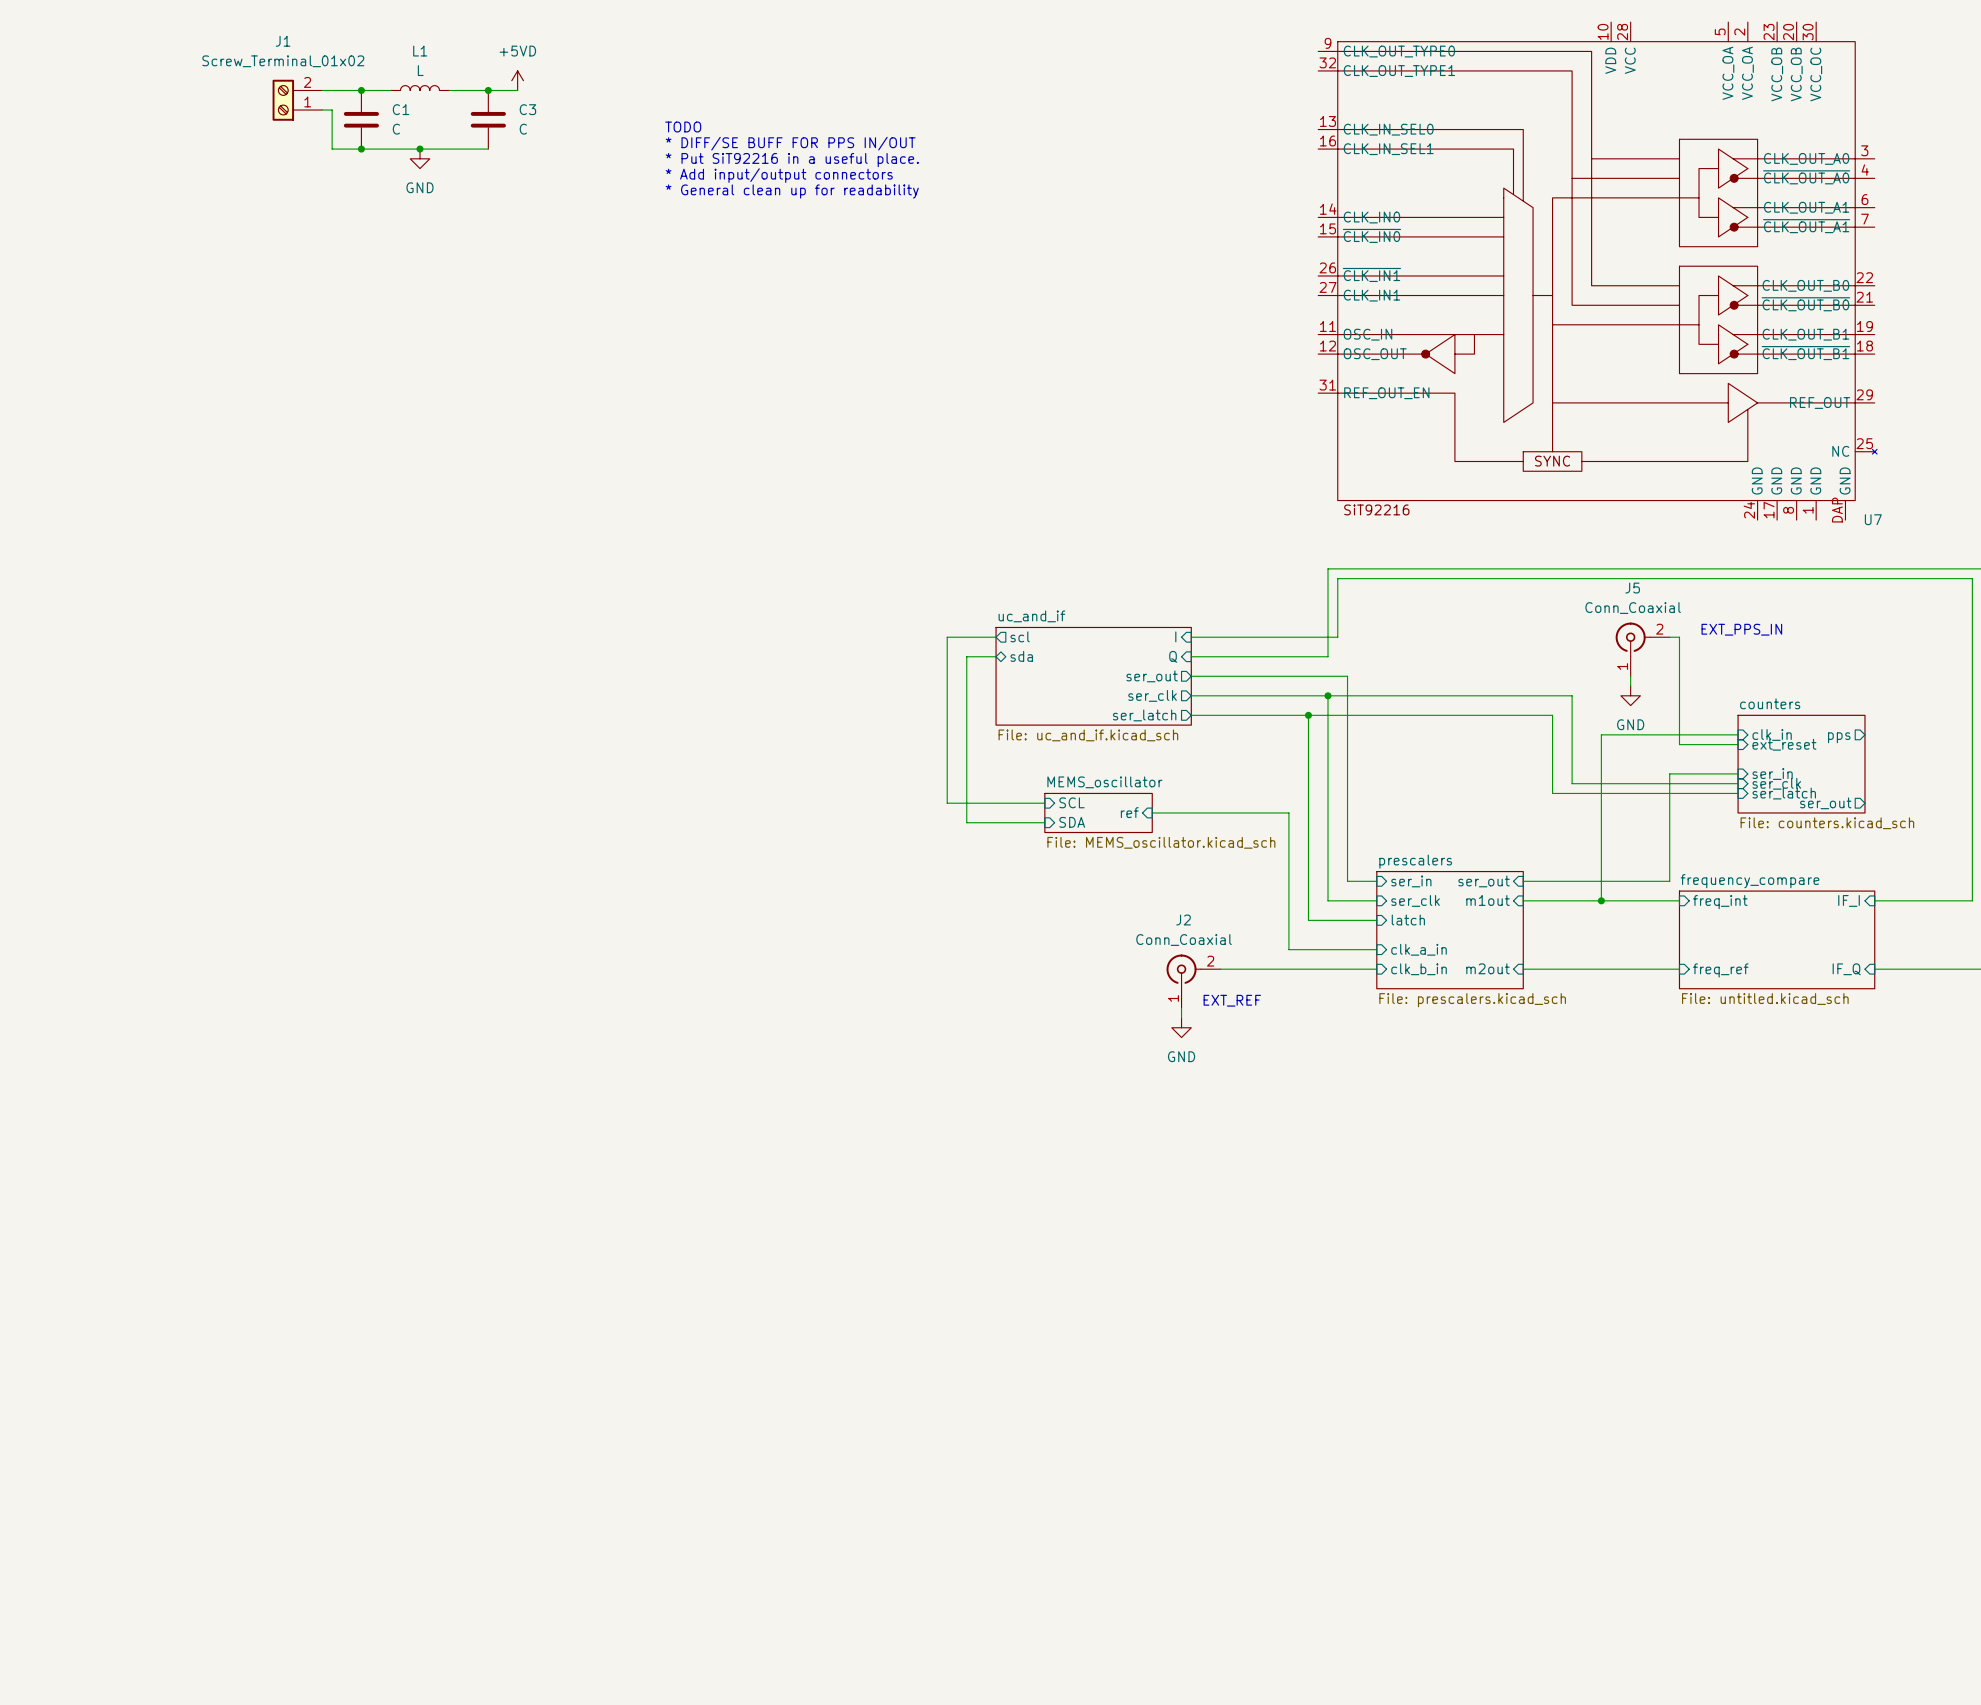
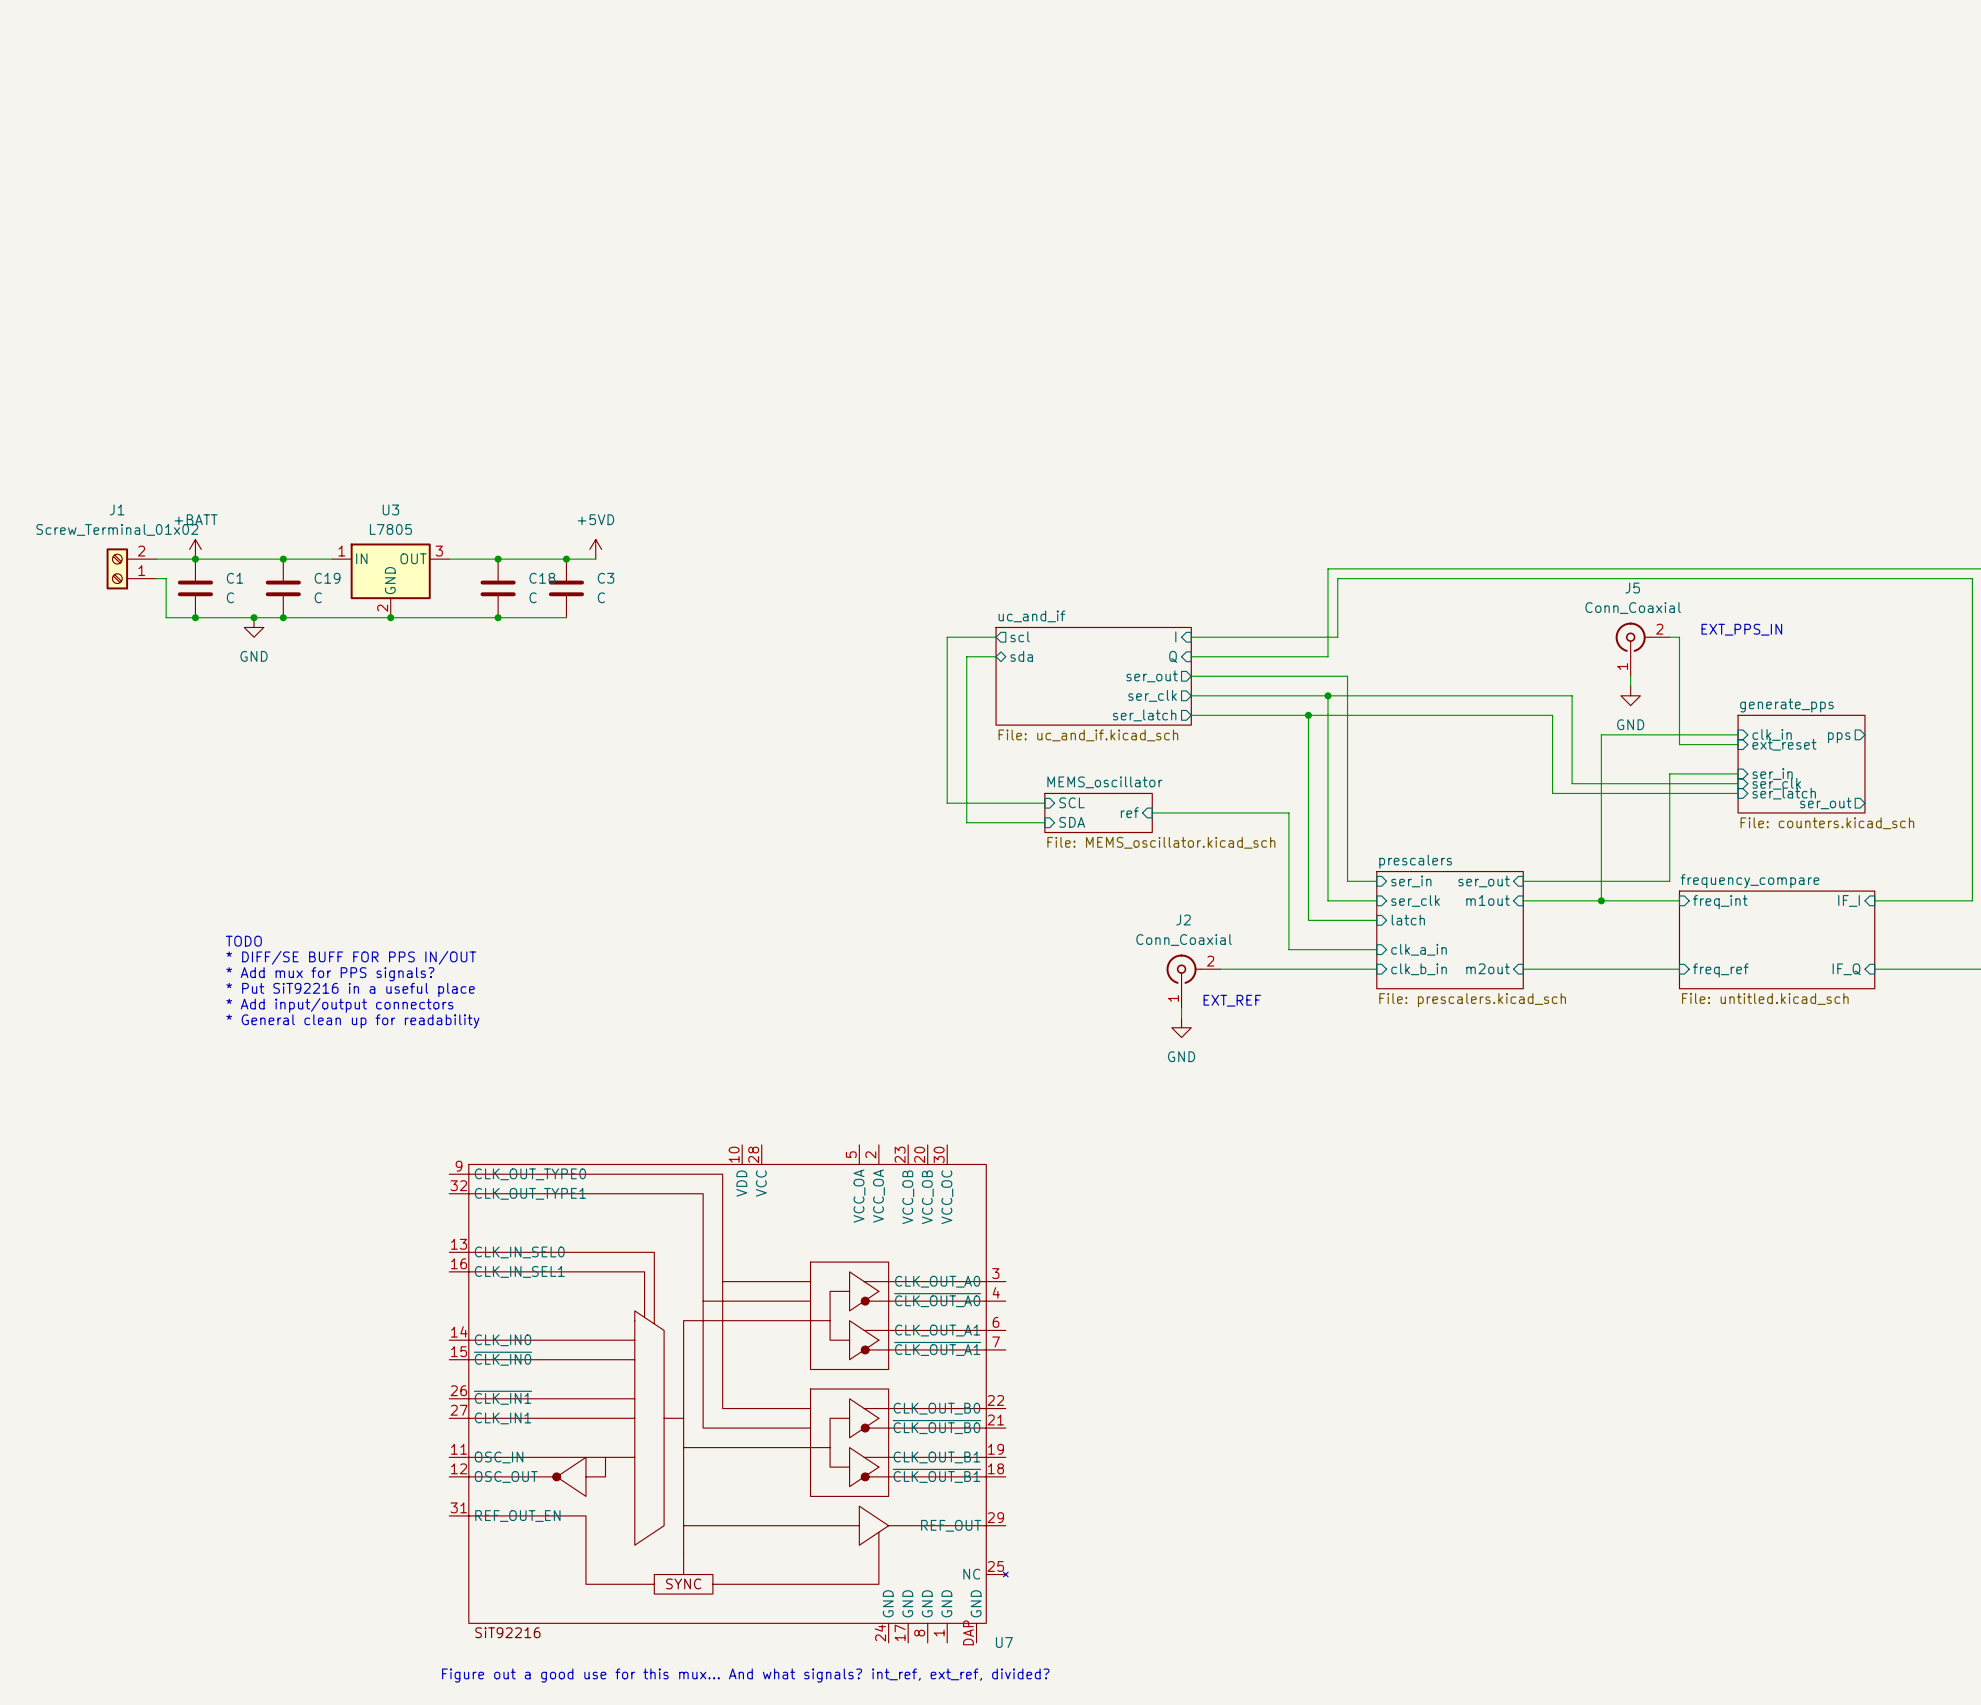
power symbol: +5VD (517, 80) -> none
L1: L (419, 88) -> none
wire: (322, 90) (390, 90) -> none
junction: (361, 90) -> none
wire: (449, 90) (517, 90) -> none
junction: (488, 90) -> none
J1 position: (297, 100) -> (131, 568)
wire: (322, 110) (332, 110) (332, 149) (488, 149) -> none
C1 position: (361, 119) -> (195, 588)
C3 position: (488, 119) -> (566, 588)
text: TODO (683, 127) -> none
text: * DIFF/SE BUFF FOR PPS IN/OUT (790, 143) -> none
junction: (361, 149) -> none
junction: (419, 149) -> none
power symbol: GND (419, 158) -> none
text: * Put SiT92216 in a useful place. (792, 160) -> none
text: * Add input/output connectors (779, 175) -> none
text: * General clean up for readability (792, 191) -> none
U7 position: (1597, 271) -> (728, 1393)
power symbol: none -> +BATT (195, 549)
power symbol: none -> +5VD (595, 549)
wire: none -> (156, 559) (332, 559)
junction: none -> (195, 559)
junction: none -> (283, 559)
wire: none -> (449, 559) (595, 559)
junction: none -> (498, 559)
junction: none -> (566, 559)
wire: none -> (156, 578) (166, 578) (166, 617) (566, 617)
U3: none -> L7805 (390, 580)
C19: none -> C (283, 588)
C18: none -> C (498, 588)
junction: none -> (195, 617)
junction: none -> (254, 617)
junction: none -> (283, 617)
junction: none -> (390, 617)
junction: none -> (498, 617)
power symbol: none -> GND (254, 627)
sheet counters name: counters (1770, 703) -> generate_pps (1786, 705)
text: none -> TODO (243, 941)
text: none -> * DIFF/SE BUFF FOR PPS IN/OUT (351, 957)
text: none -> * Add mux for PPS signals? (330, 974)
text: none -> * Put SiT92216 in a useful place (350, 989)
text: none -> * Add input/output connectors (339, 1005)
text: none -> * General clean up for readability (352, 1021)
text: none -> Figure out a good use for this mux... And what signals? int_ref, ext_ref, divided? (745, 1675)

